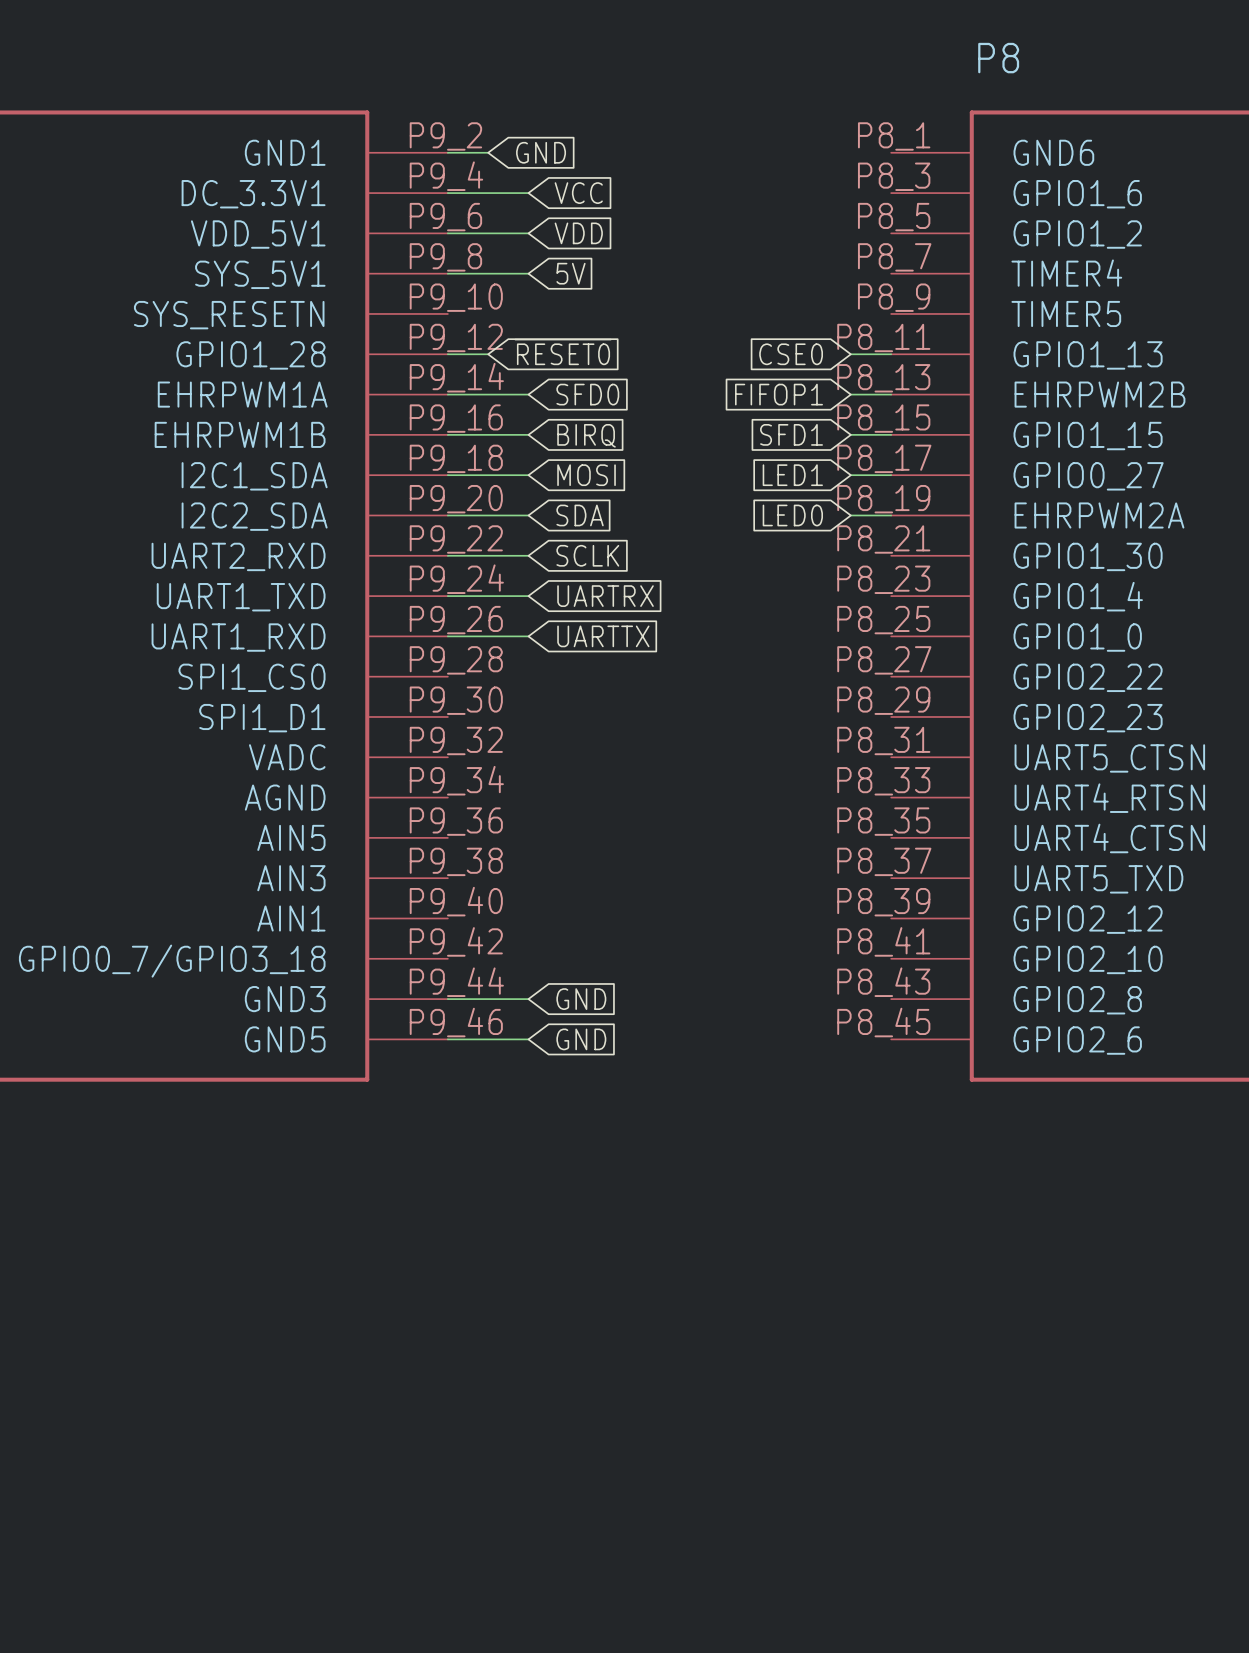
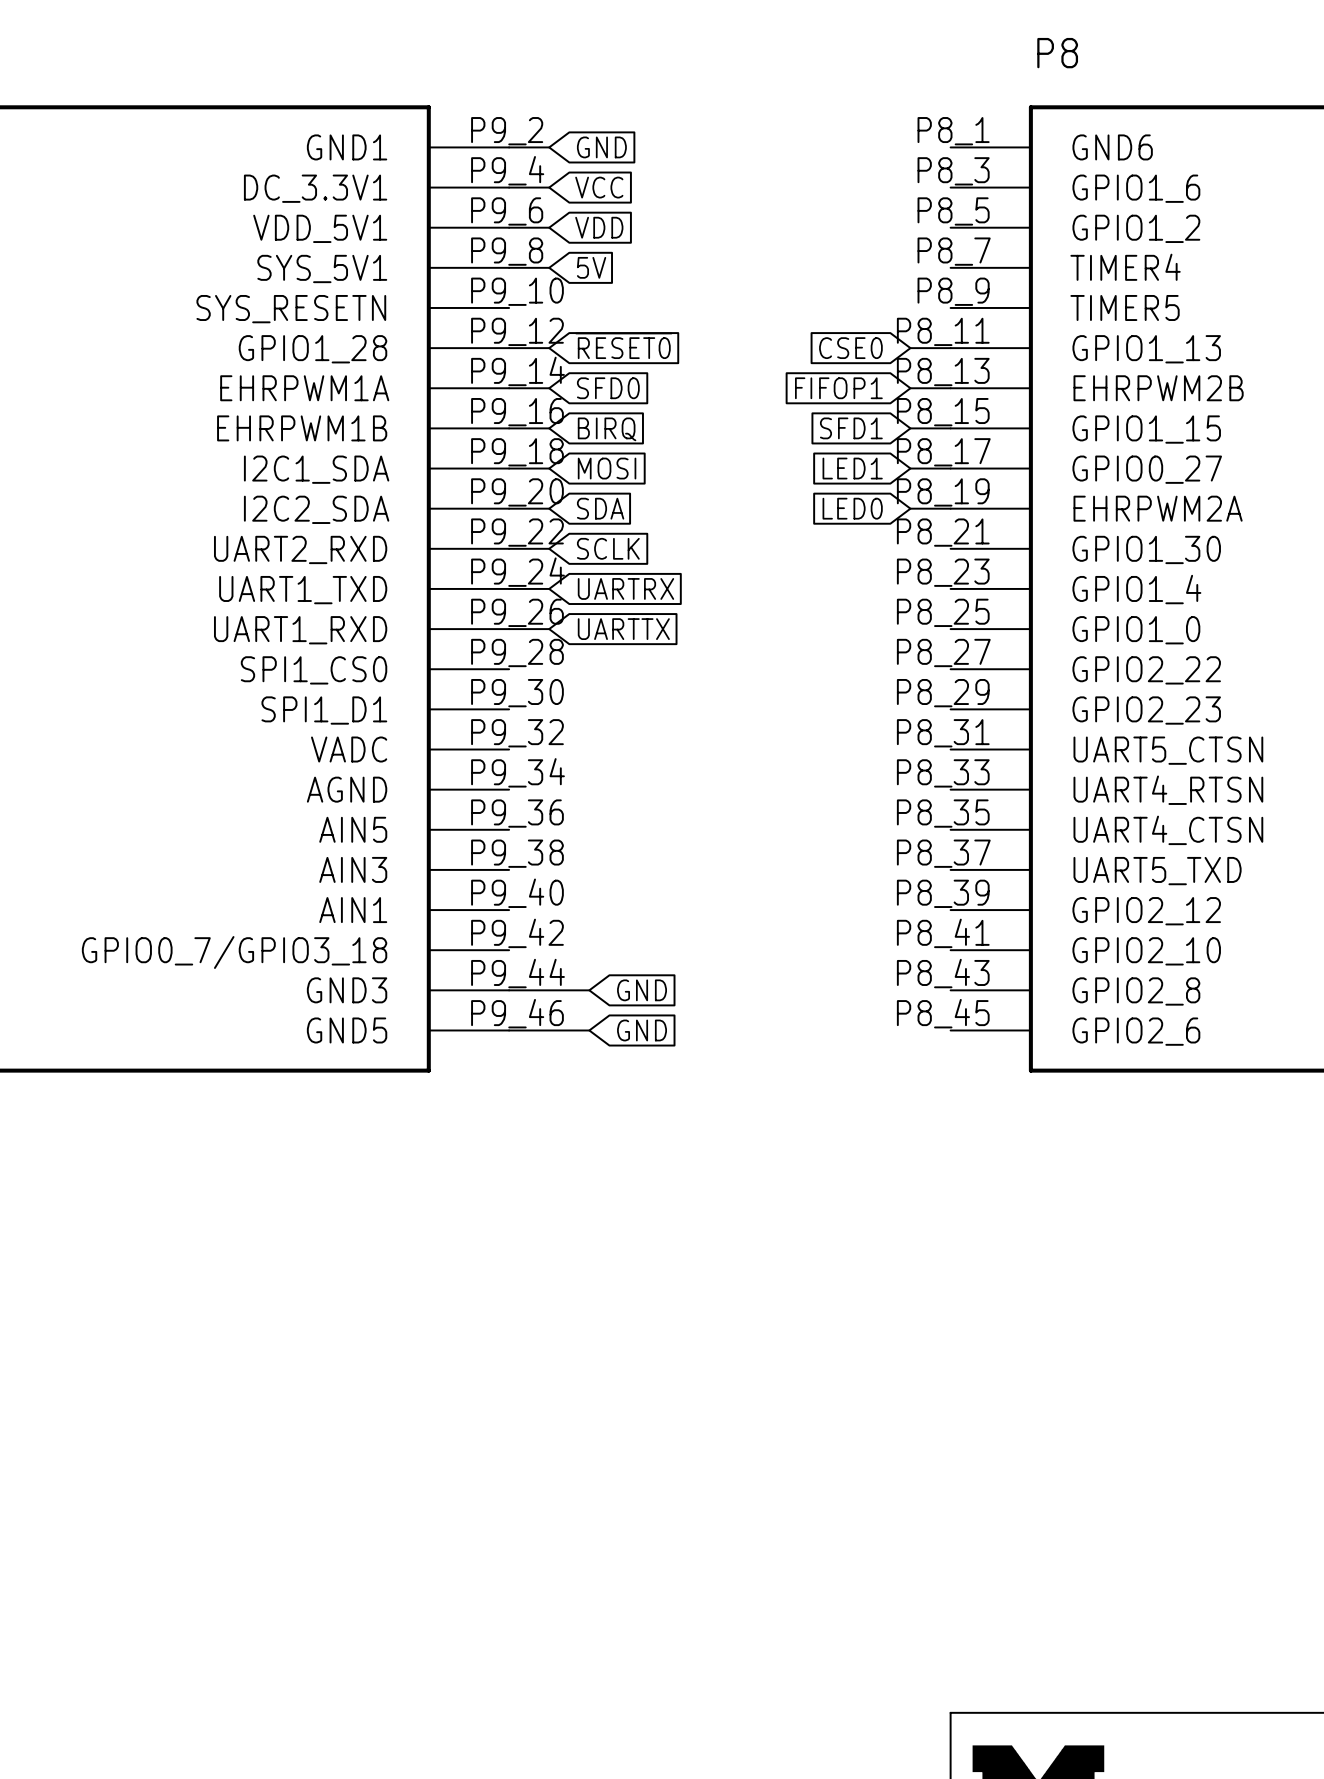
wire: (488, 193) (528, 193) -> none
global label position: VCC (578, 193) -> VCC (599, 187)
wire: (488, 233) (528, 233) -> none
global label position: VDD (578, 233) -> VDD (599, 227)
wire: (488, 273) (528, 273) -> none
global label position: 5V (570, 273) -> 5V (591, 267)
wire: (488, 394) (528, 394) -> none
global label position: SFD0 (587, 394) -> SFD0 (608, 388)
wire: (488, 434) (528, 434) -> none
global label position: BIRQ (586, 435) -> BIRQ (607, 429)
wire: (488, 475) (528, 475) -> none
global label position: MOSI (586, 475) -> MOSI (607, 468)
wire: (488, 515) (528, 515) -> none
global label position: SDA (580, 515) -> SDA (600, 508)
wire: (488, 555) (528, 555) -> none
global label position: SCLK (587, 555) -> SCLK (608, 548)
wire: (488, 596) (528, 596) -> none
global label position: UARTRX (605, 596) -> UARTRX (625, 588)
wire: (488, 636) (528, 636) -> none
global label position: UARTTX (603, 636) -> UARTTX (623, 629)

